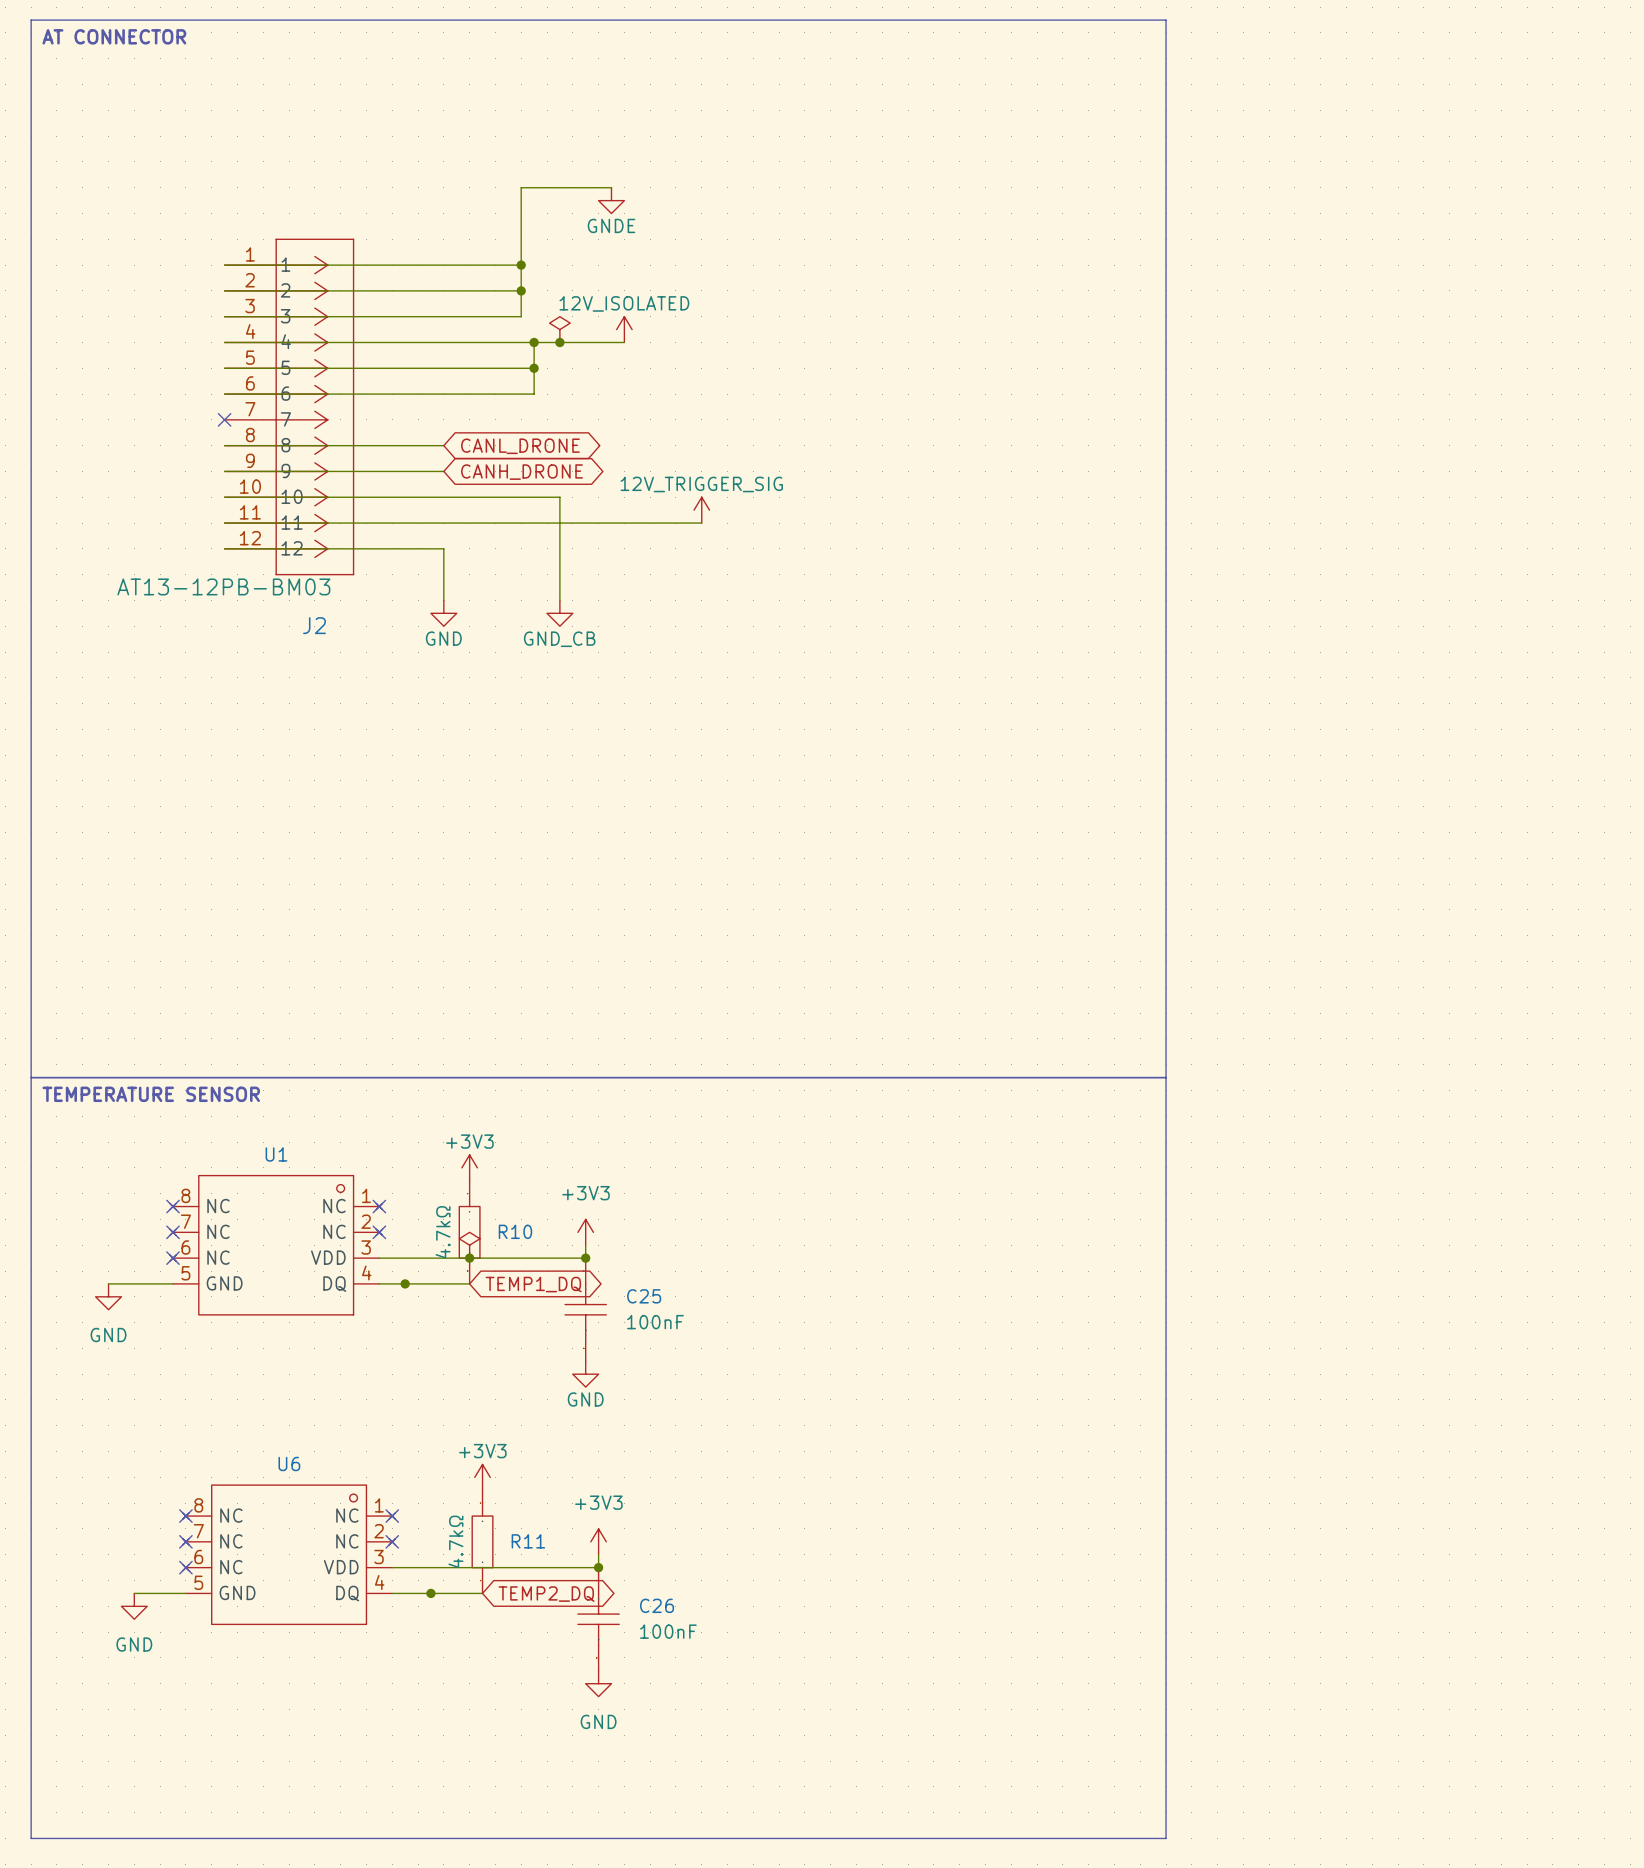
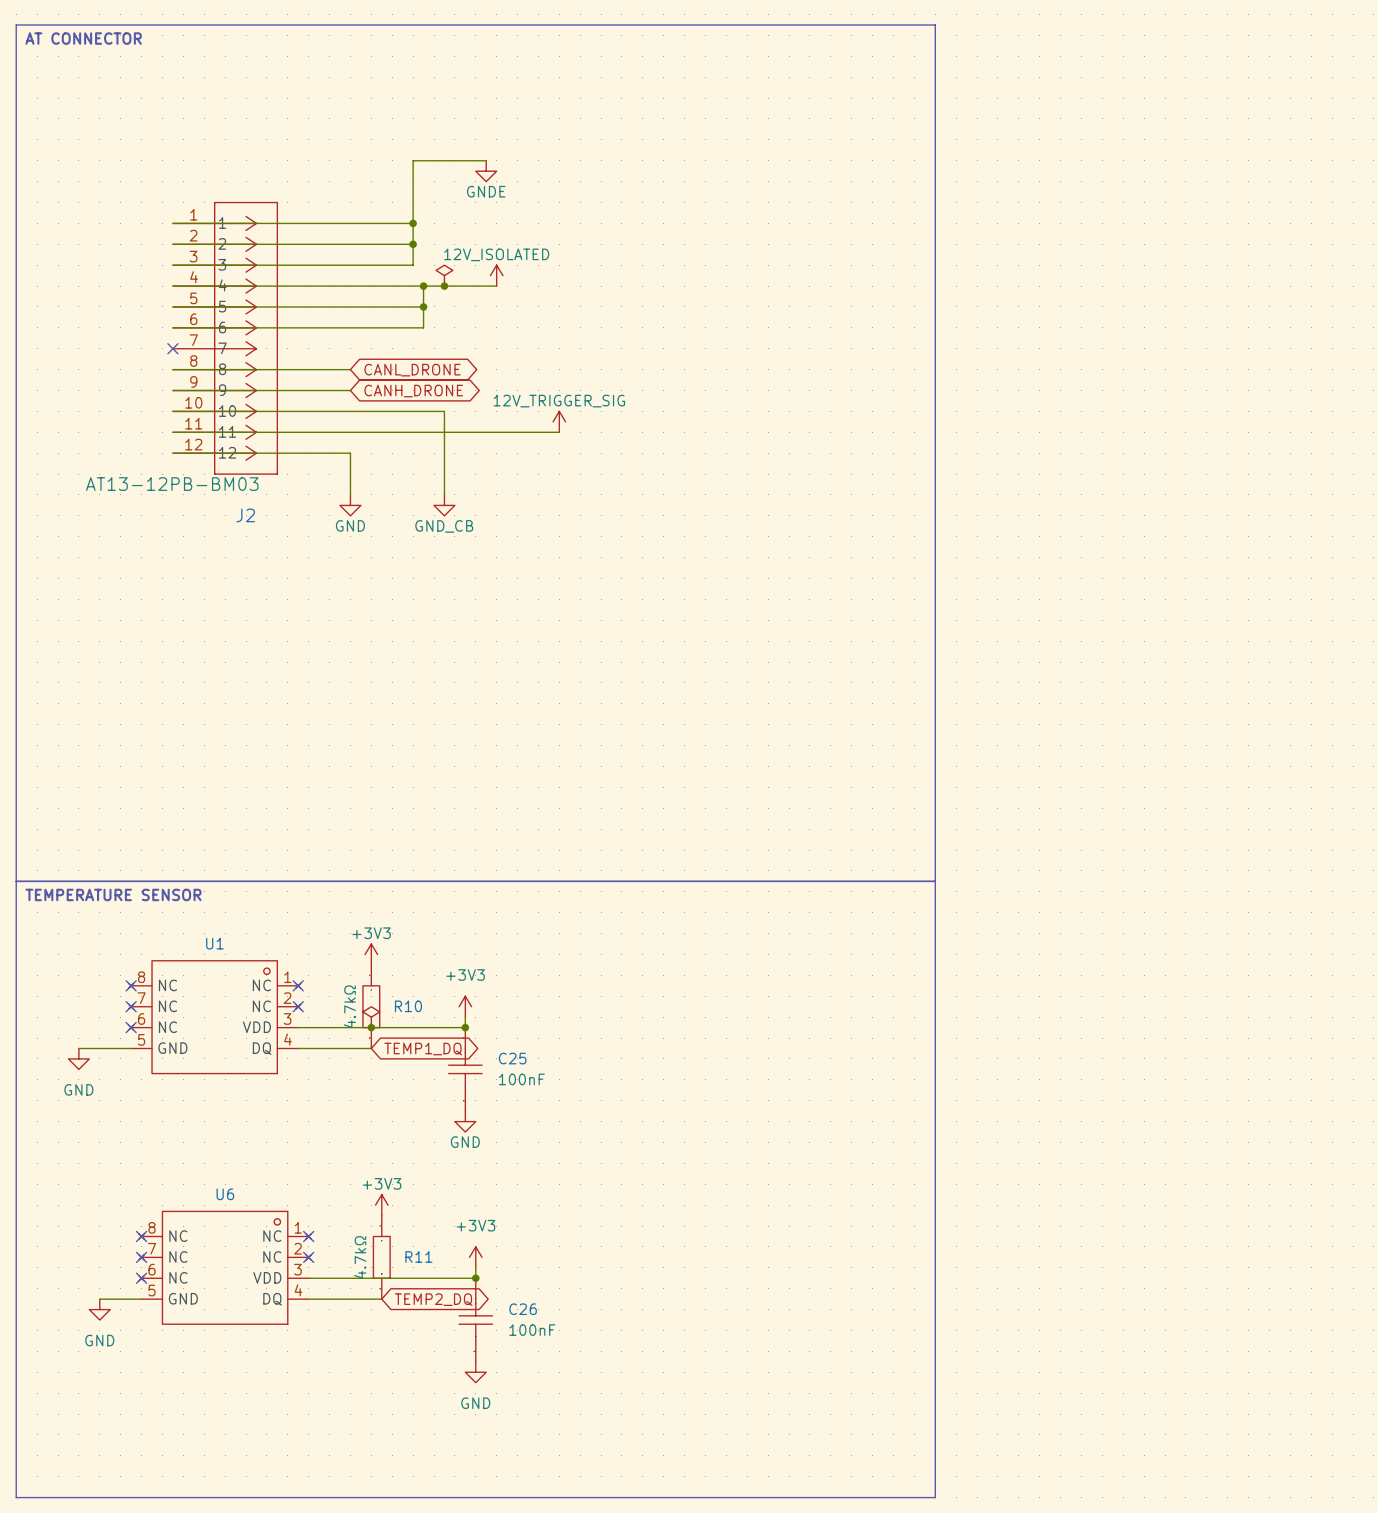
junction: (405, 1283) -> none
junction: (430, 1593) -> none

